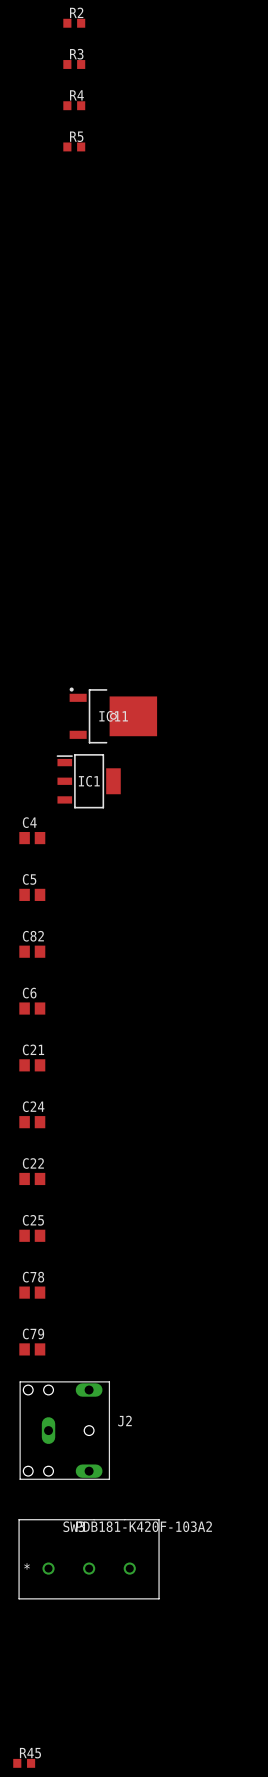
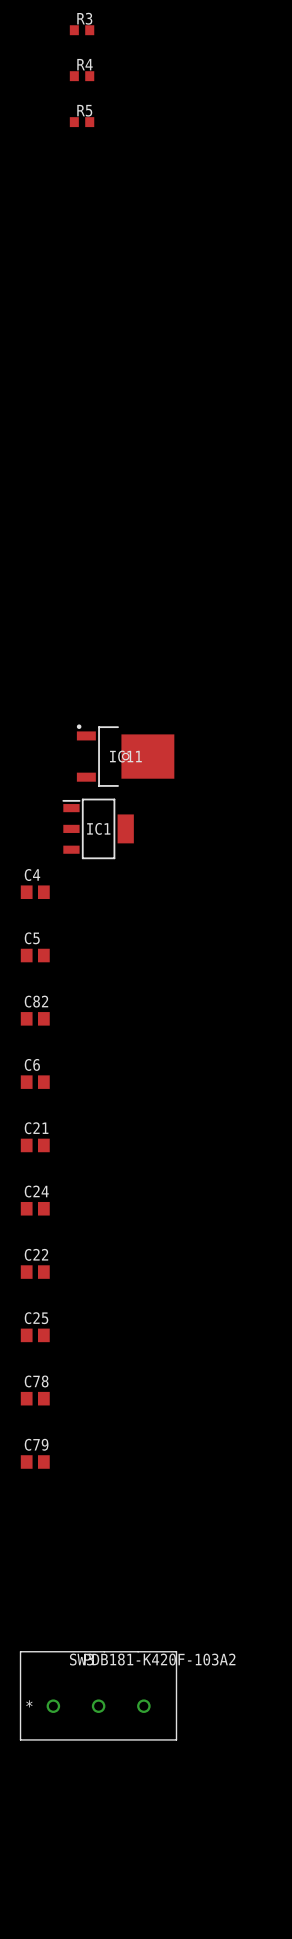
J2: (64, 1430) -> none
R45: (24, 1763) -> none

